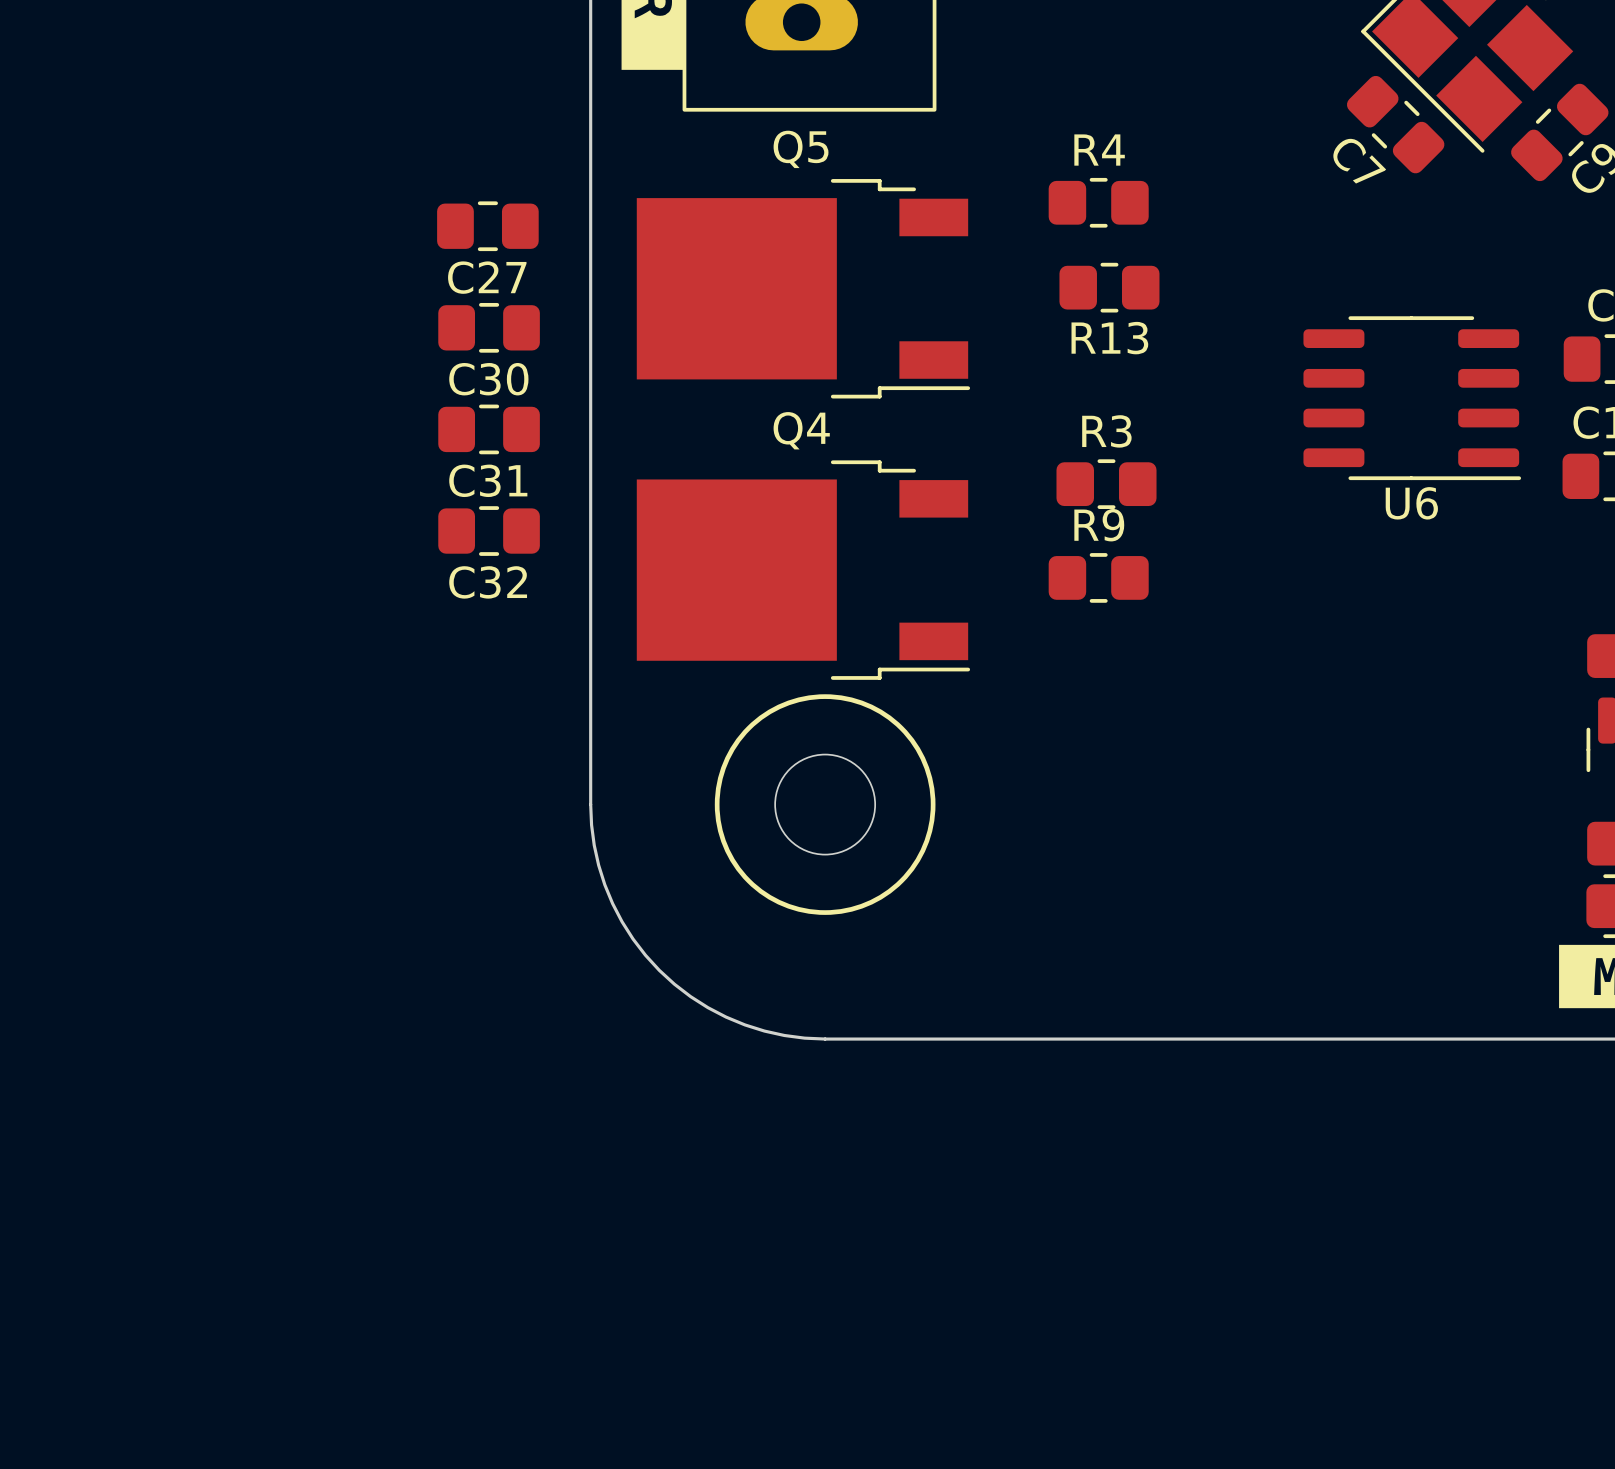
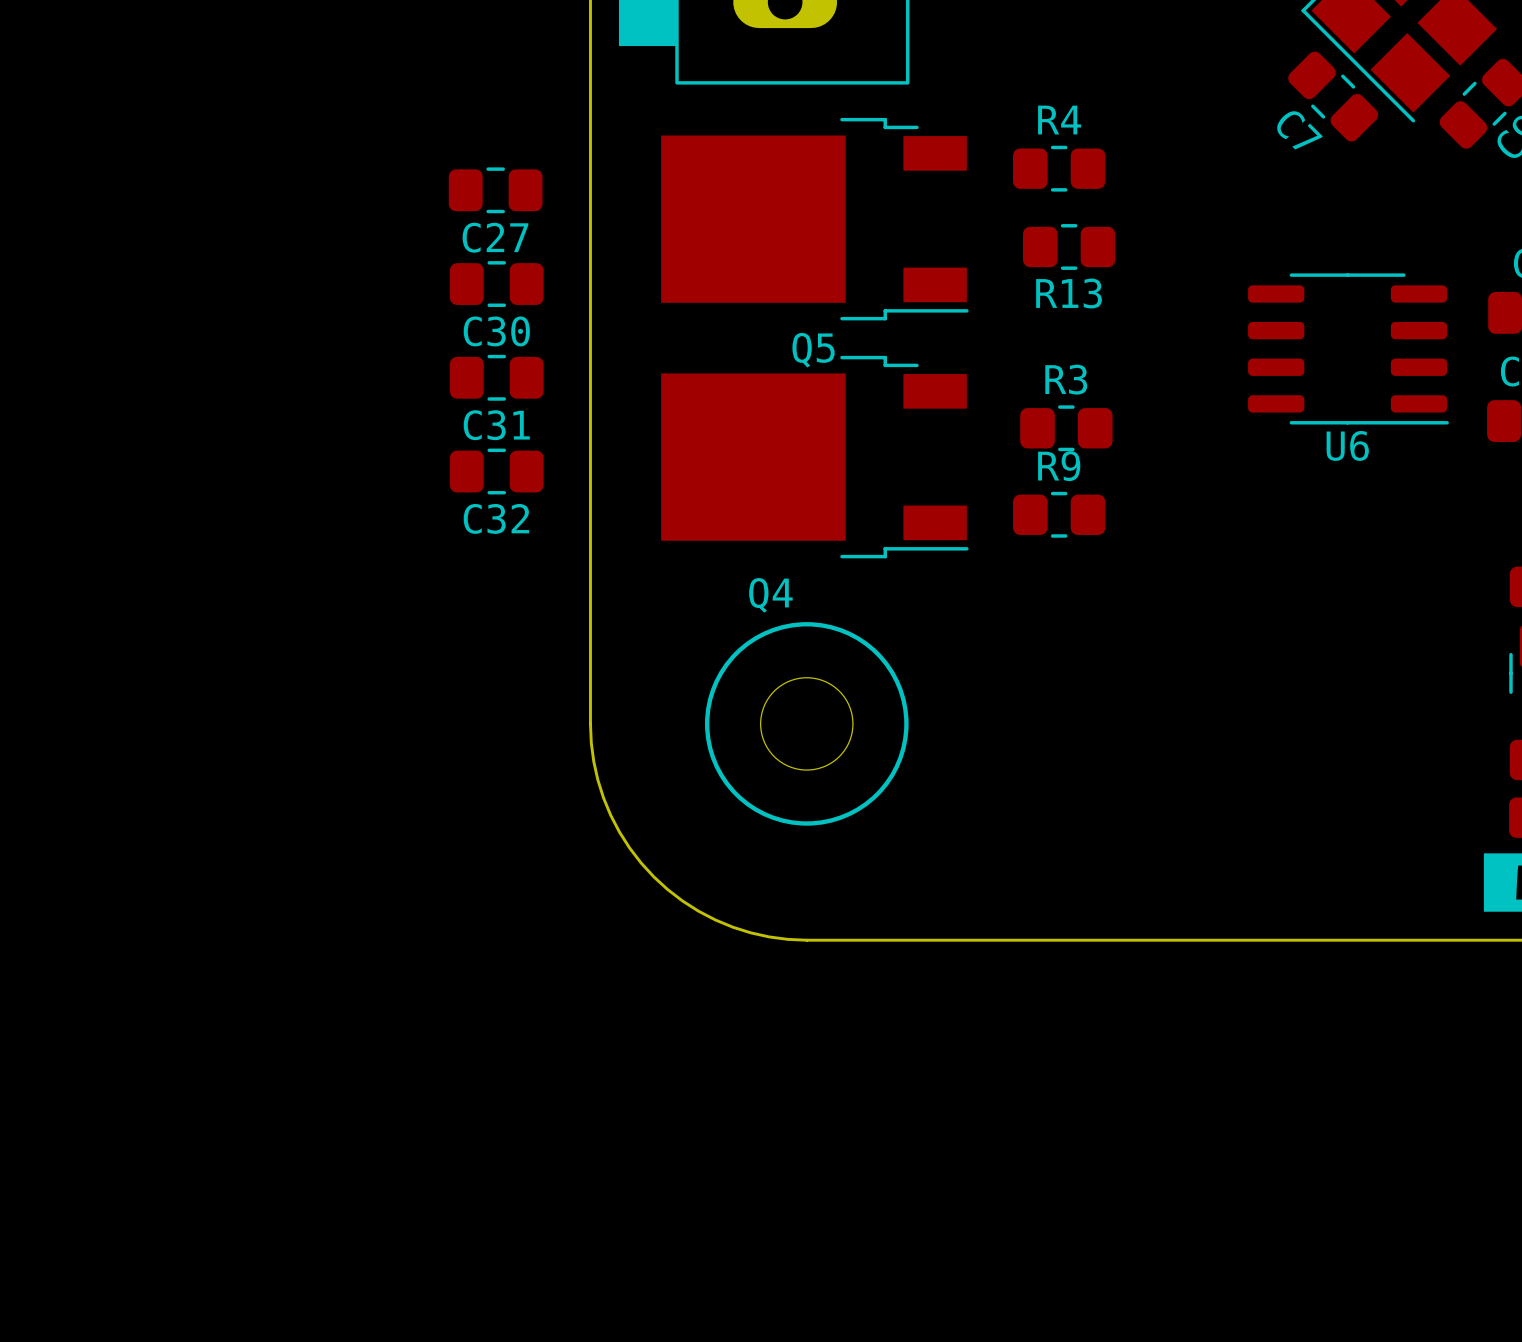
Q5 name position: Q5 (801, 149) -> Q5 (813, 350)
Q5 position: (803, 288) -> (814, 219)
Q4 name position: Q4 (801, 430) -> Q4 (770, 595)
Q4 position: (803, 570) -> (814, 457)

